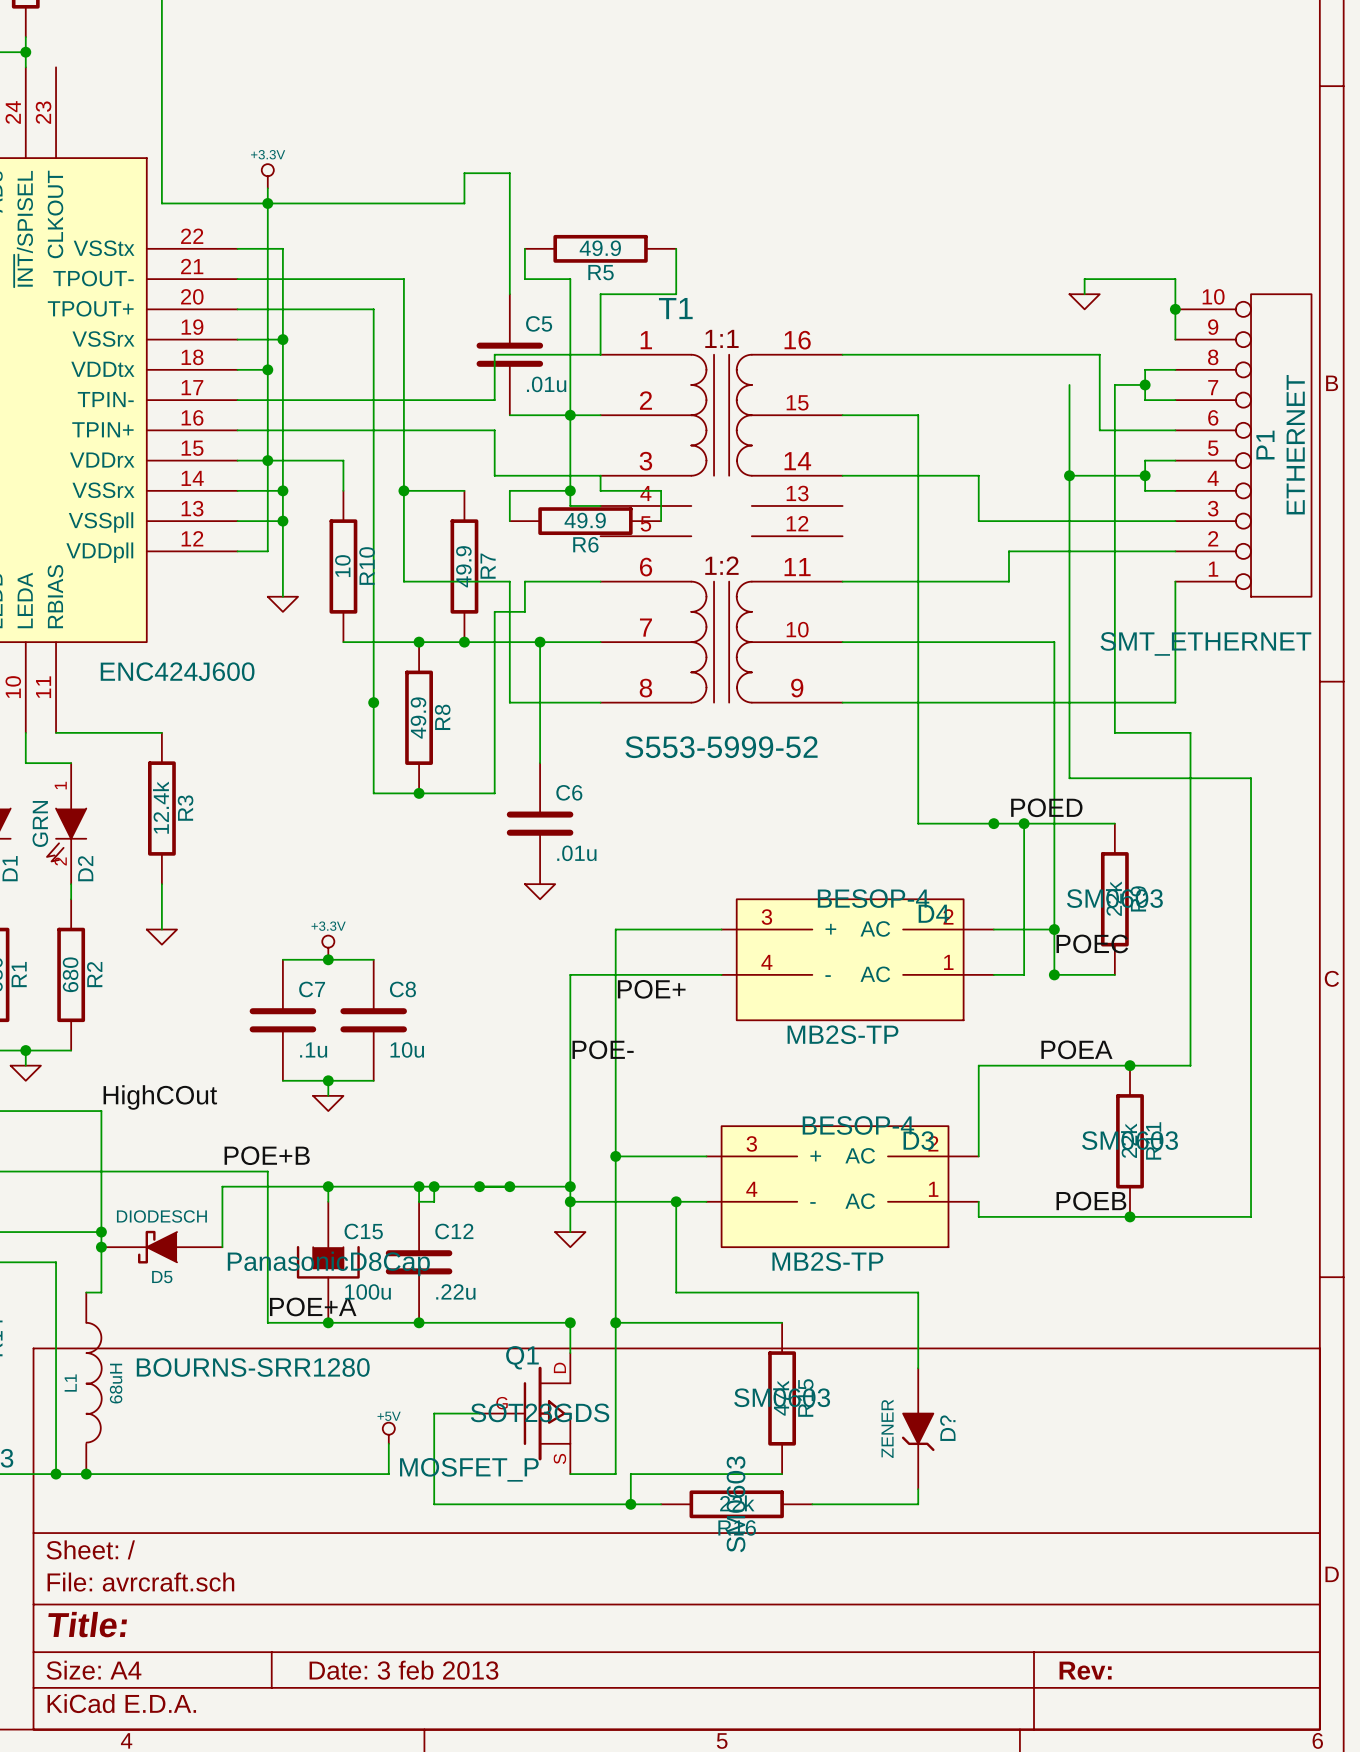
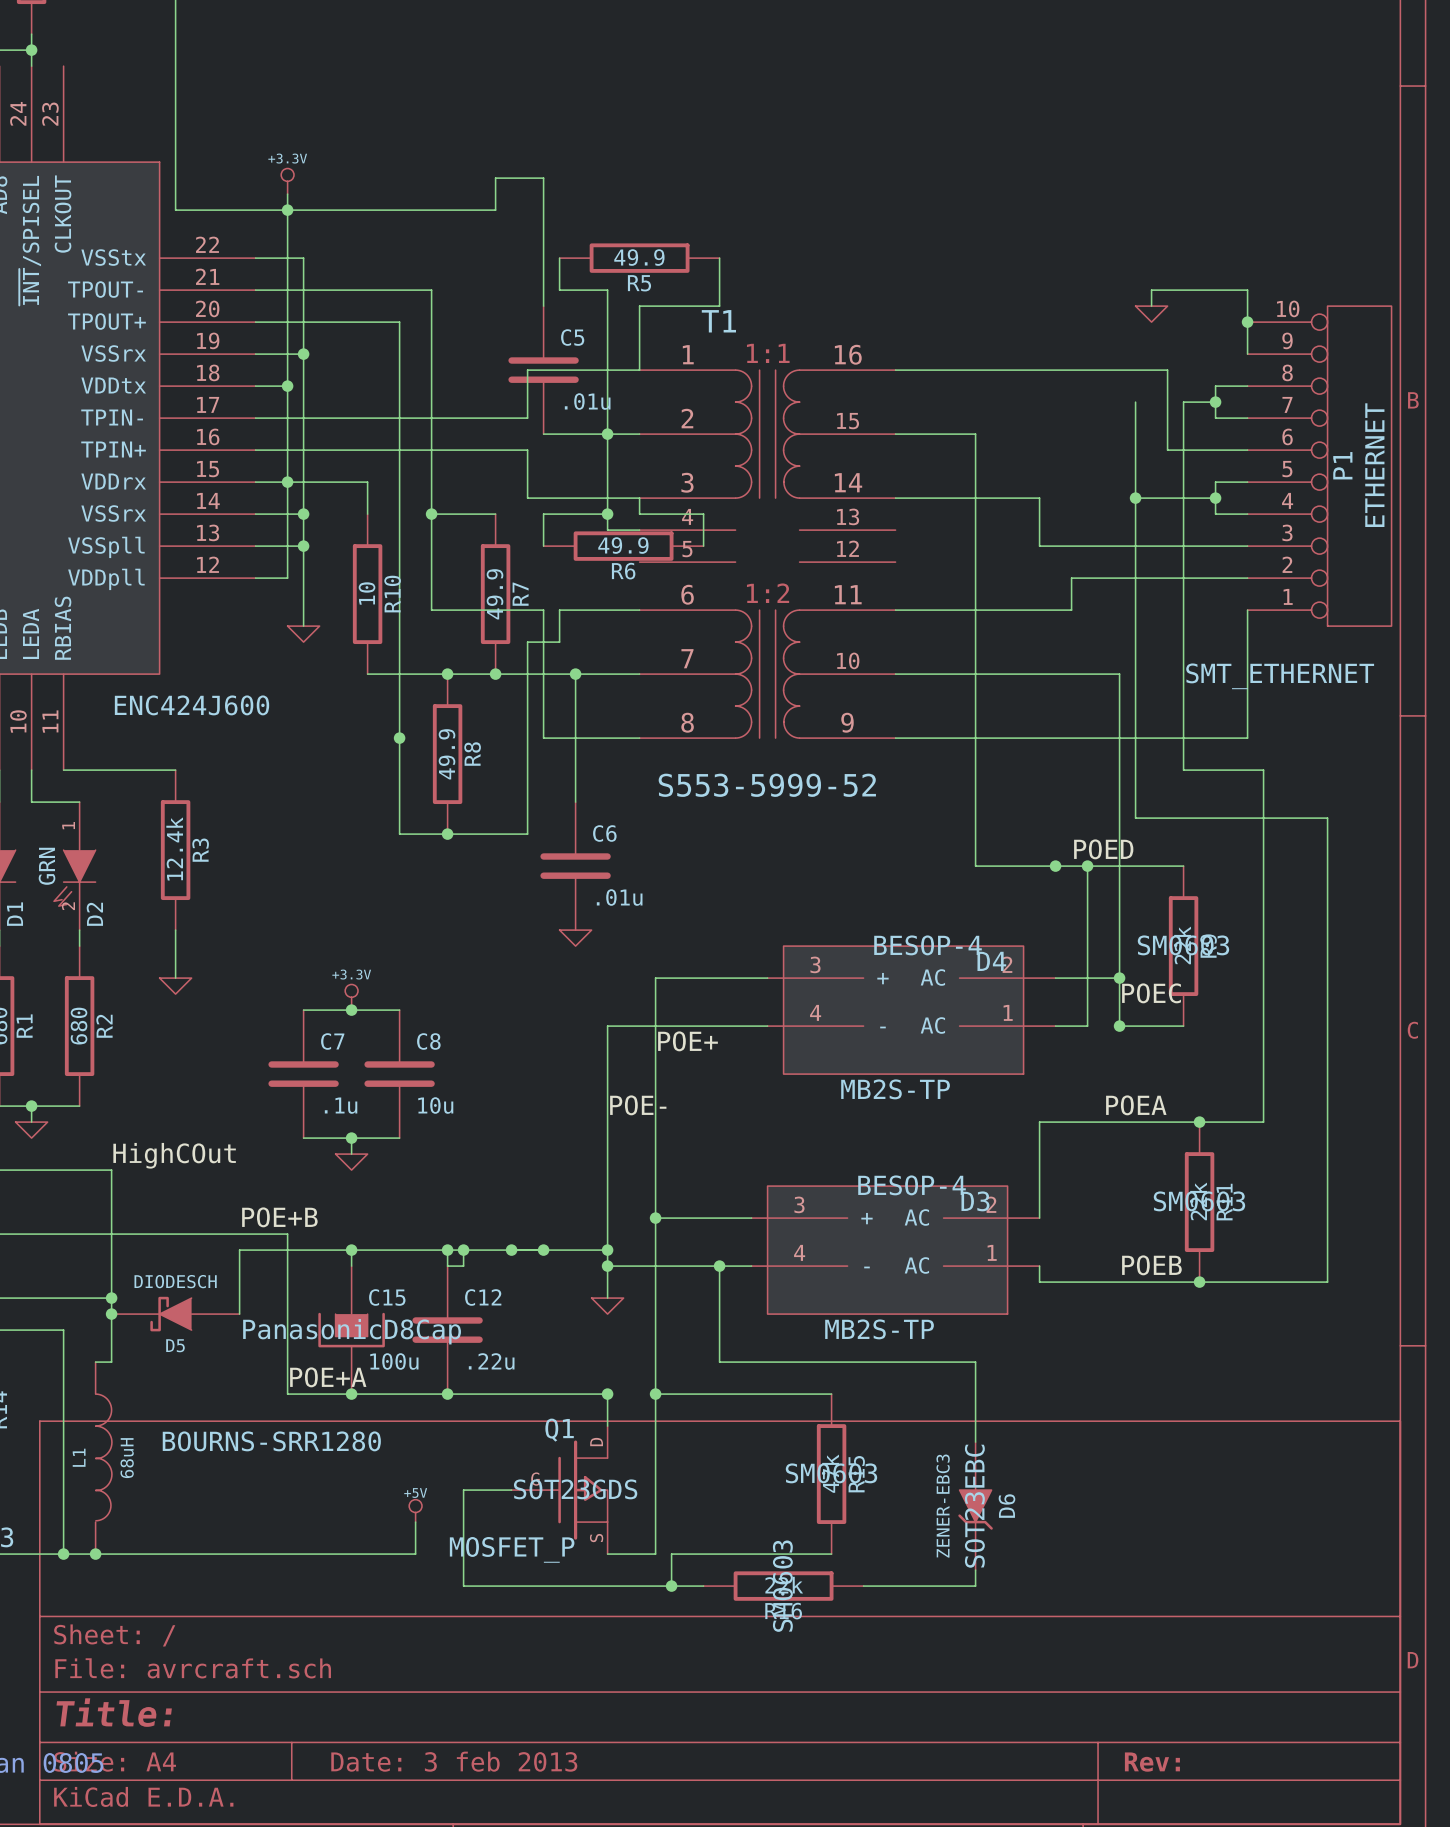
D? value: ZENER (887, 1428) -> ZENER-EBC3 (943, 1506)
D? text: none -> SOT23EBC (974, 1506)
D? name: D? (947, 1428) -> D6 (1006, 1506)

